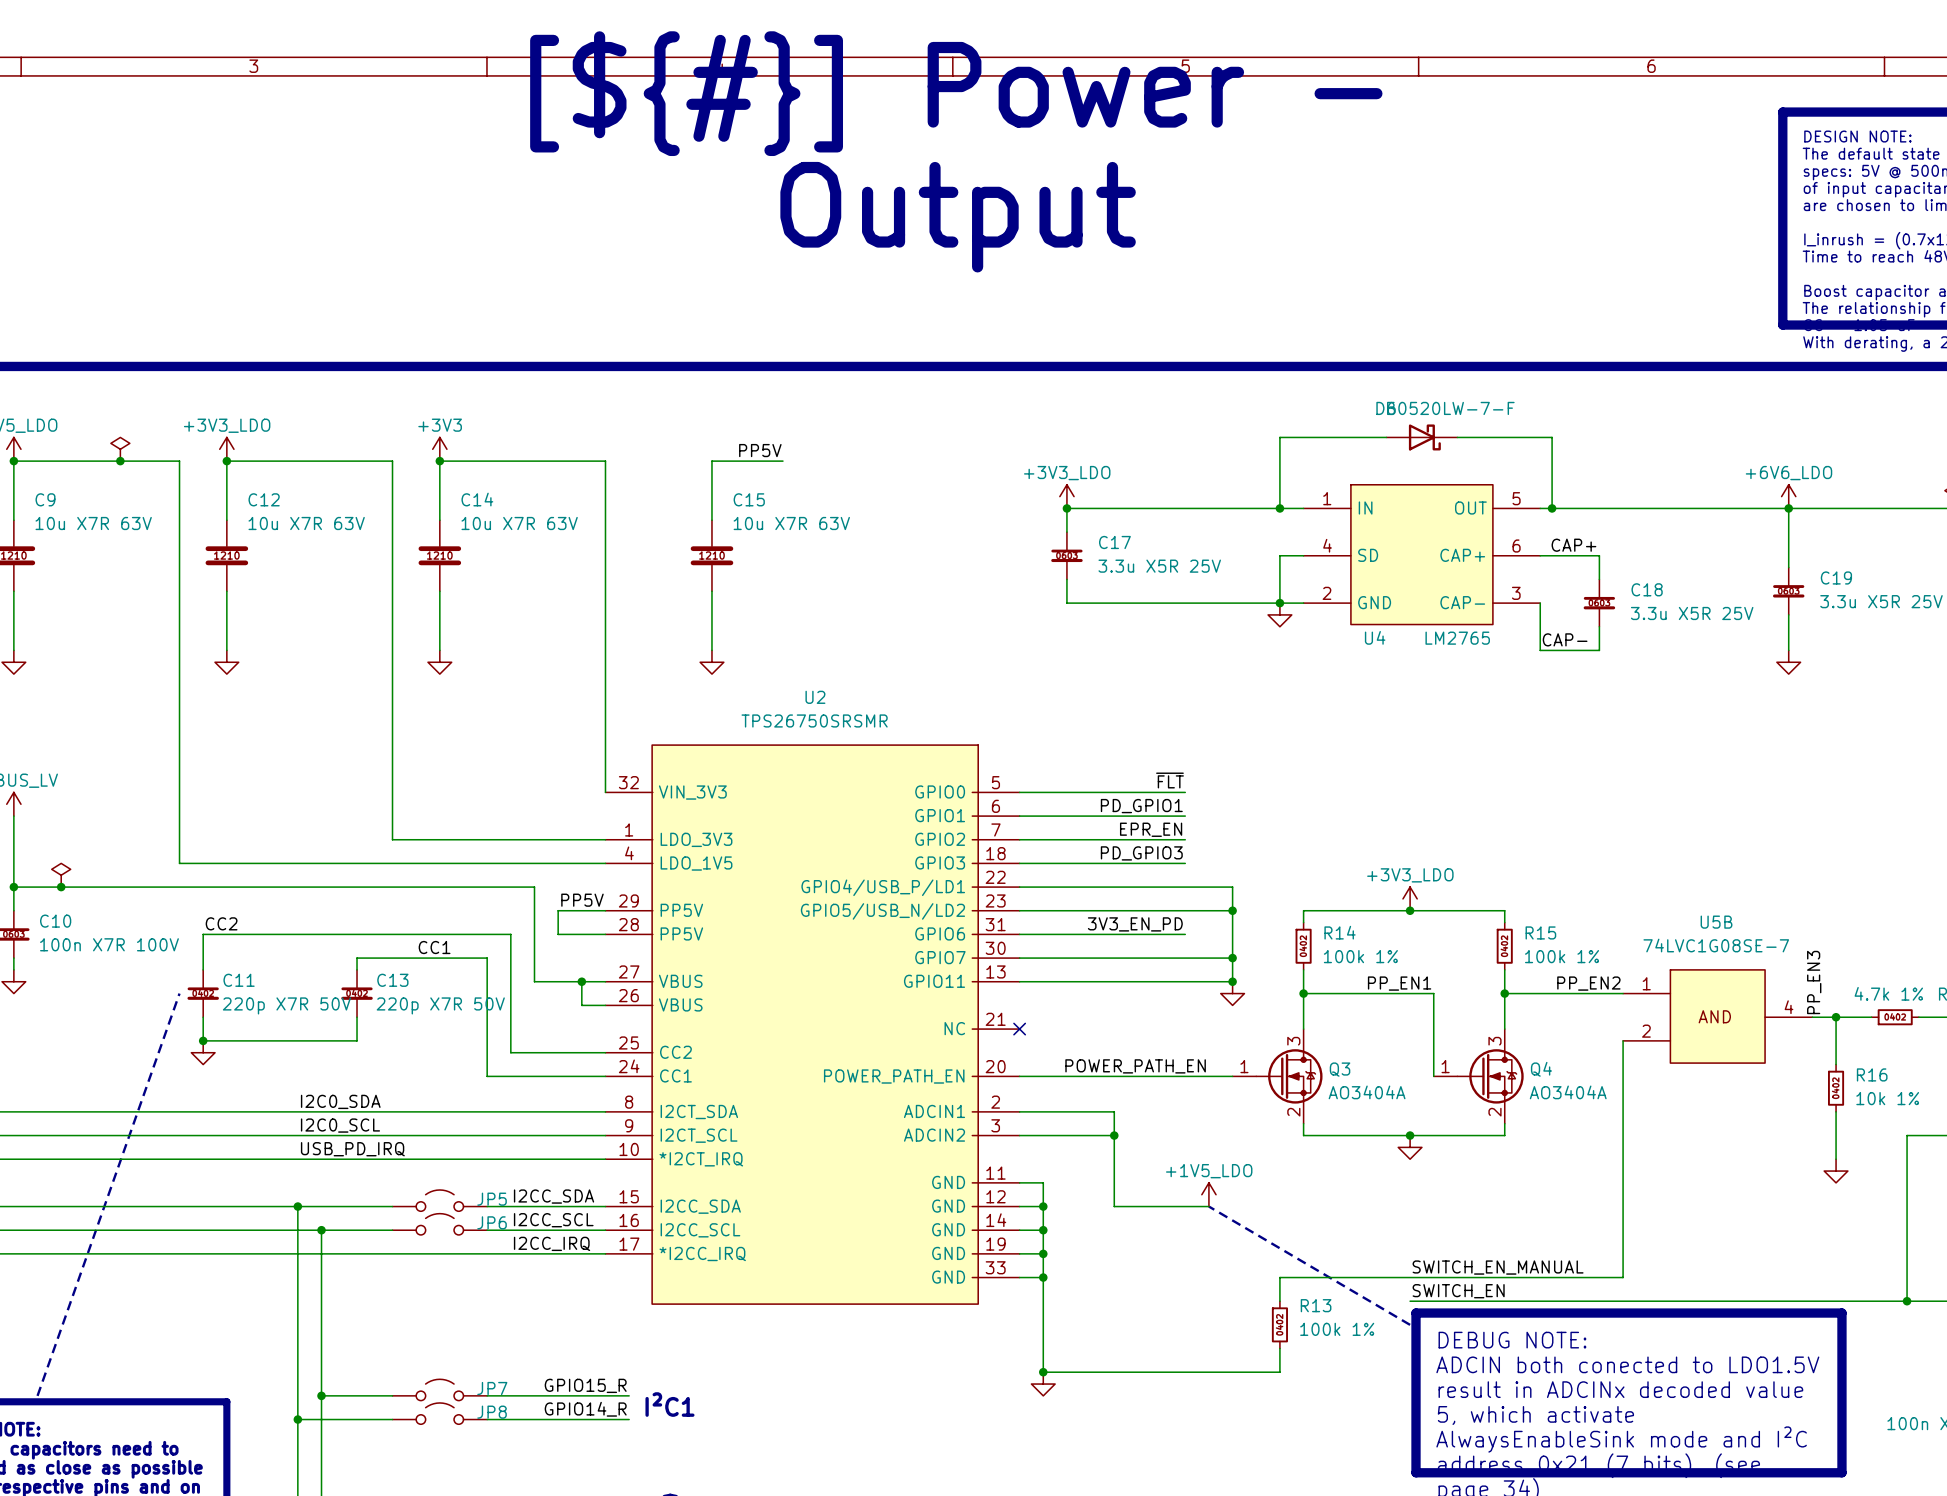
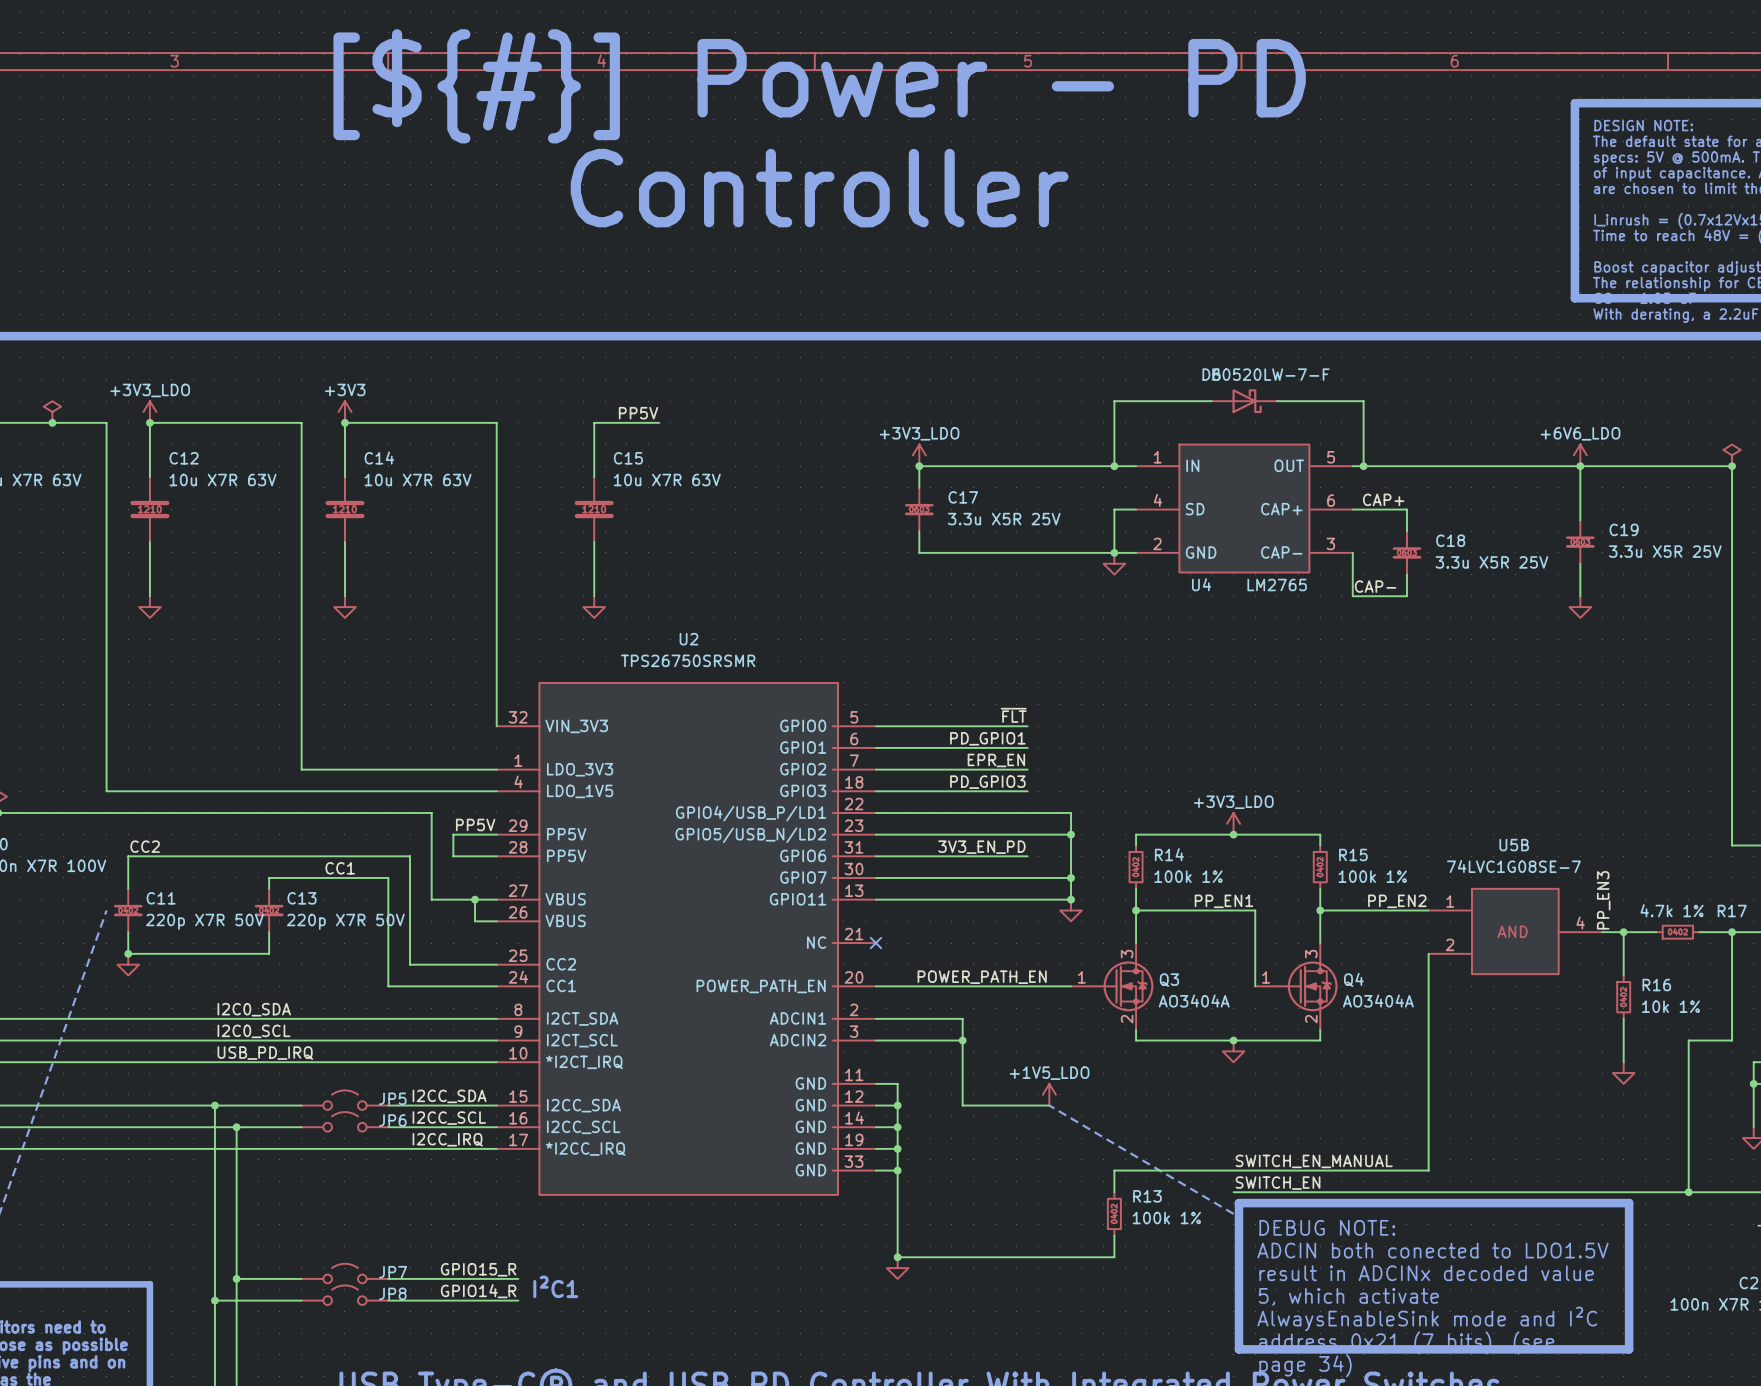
text: [${#}] Power - (956, 93) -> [${#}] Power - PD (819, 86)
text: Output (958, 217) -> Controller (819, 188)

